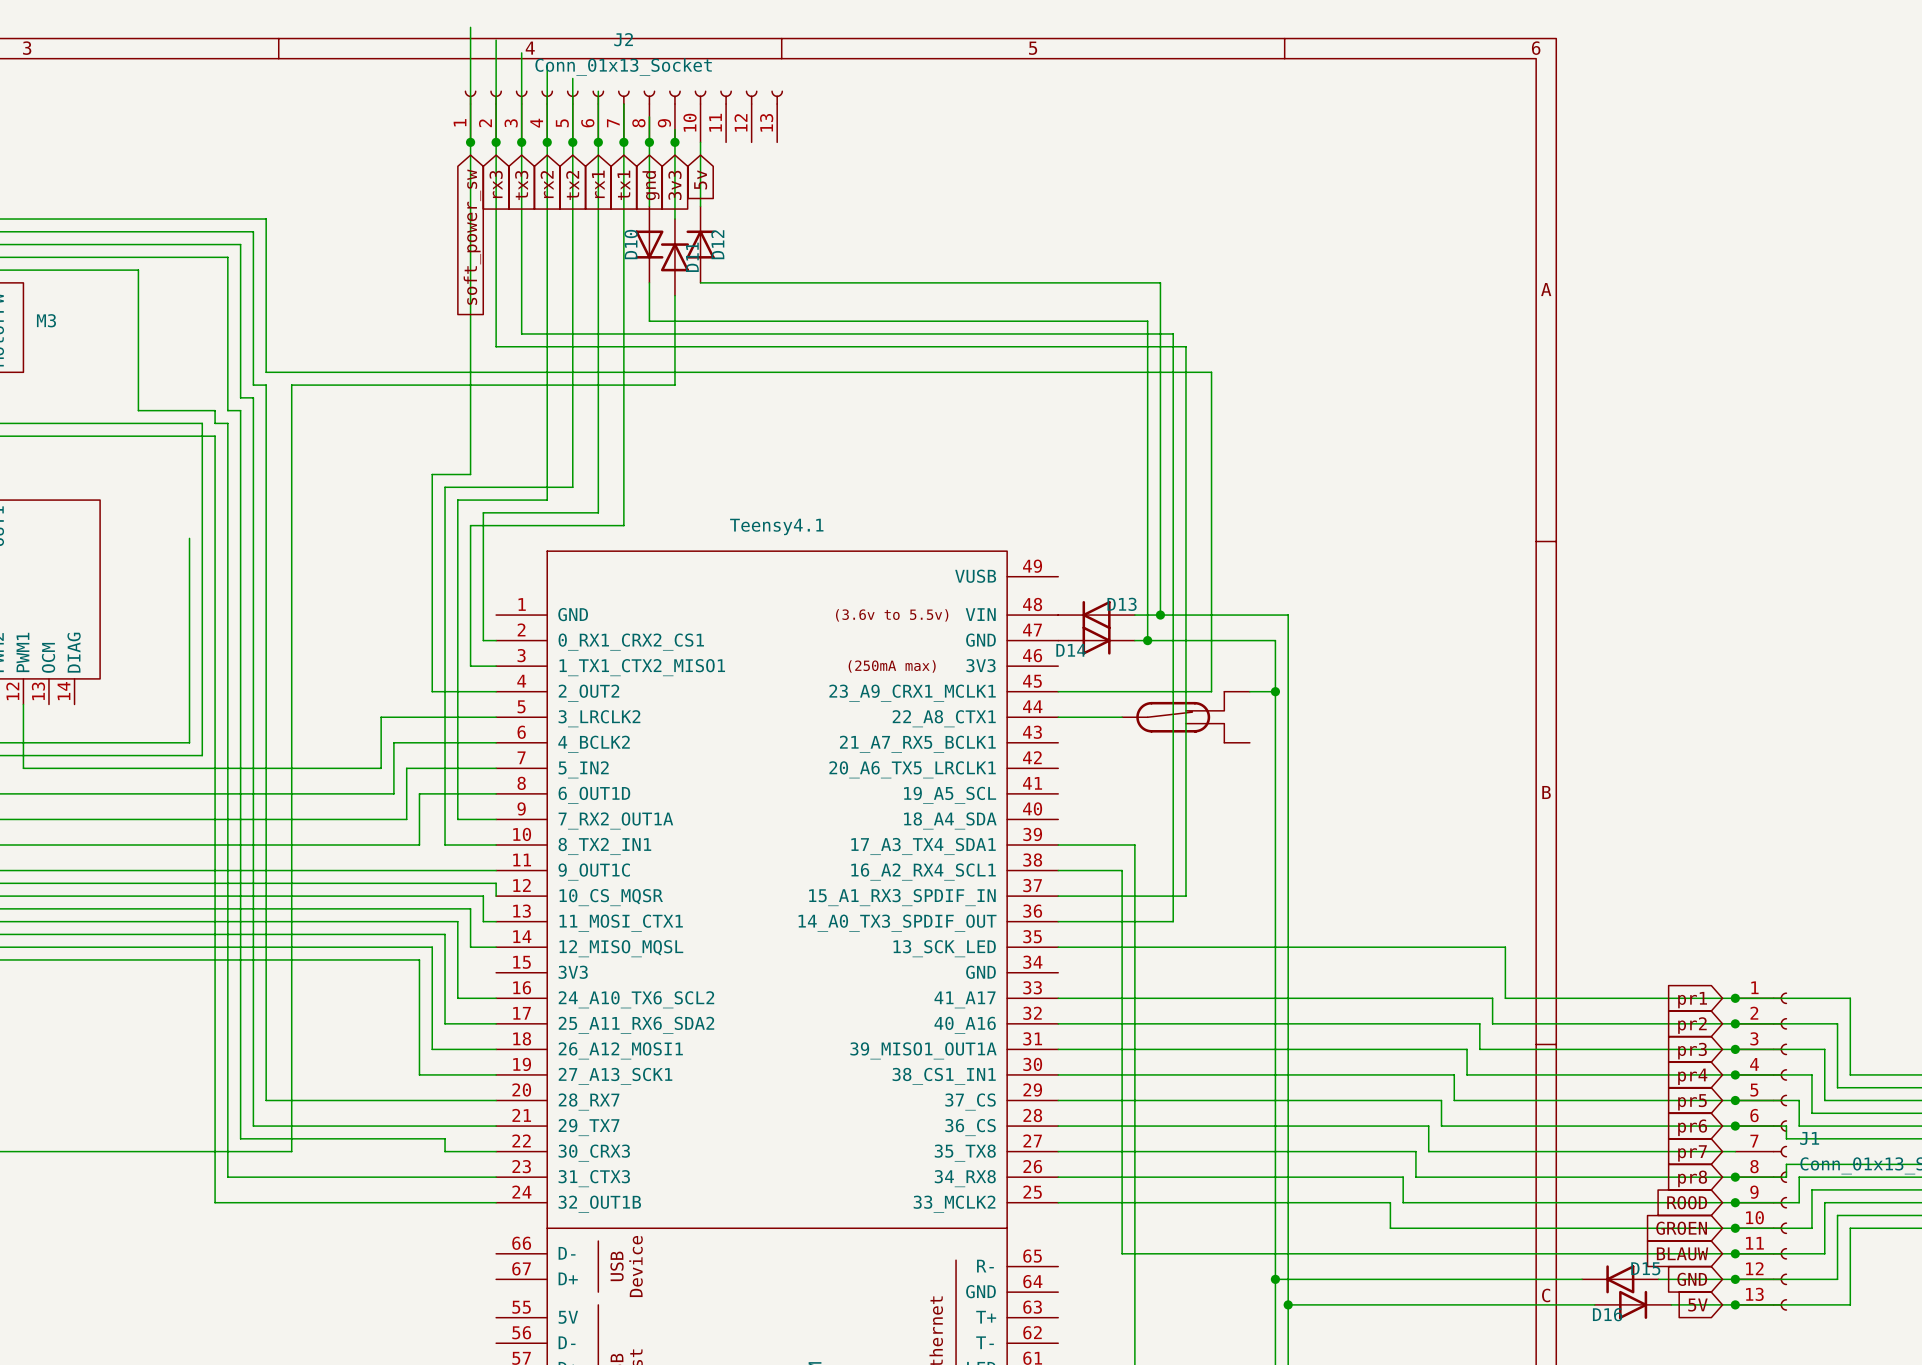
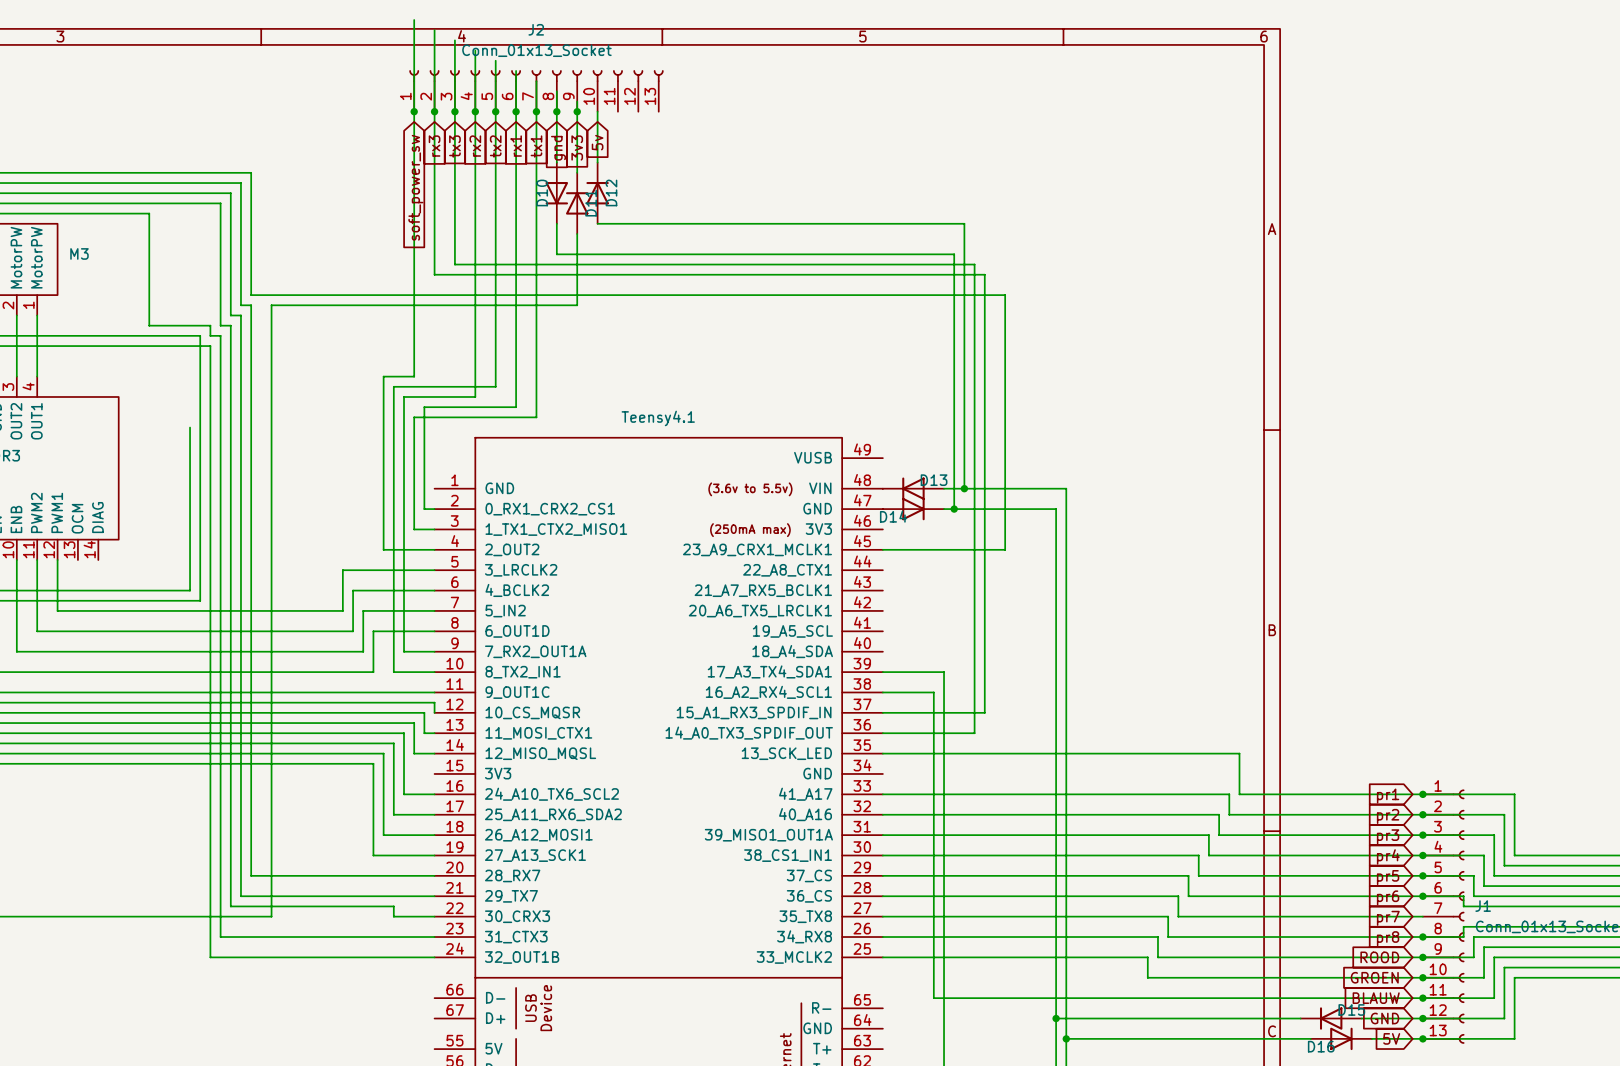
wire: (1249, 691) (1275, 691) -> none
junction: (1275, 691) -> none
wire: (1058, 717) (1122, 717) -> none
part: (1185, 717) -> none

